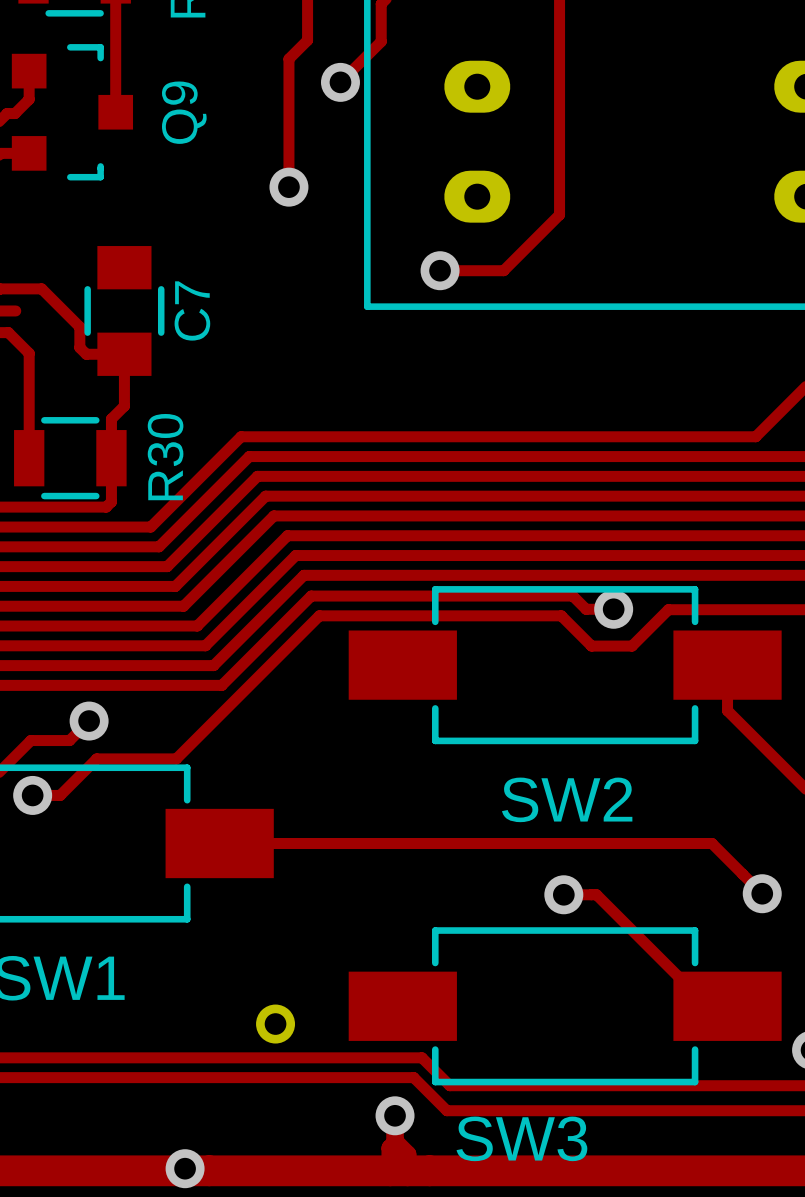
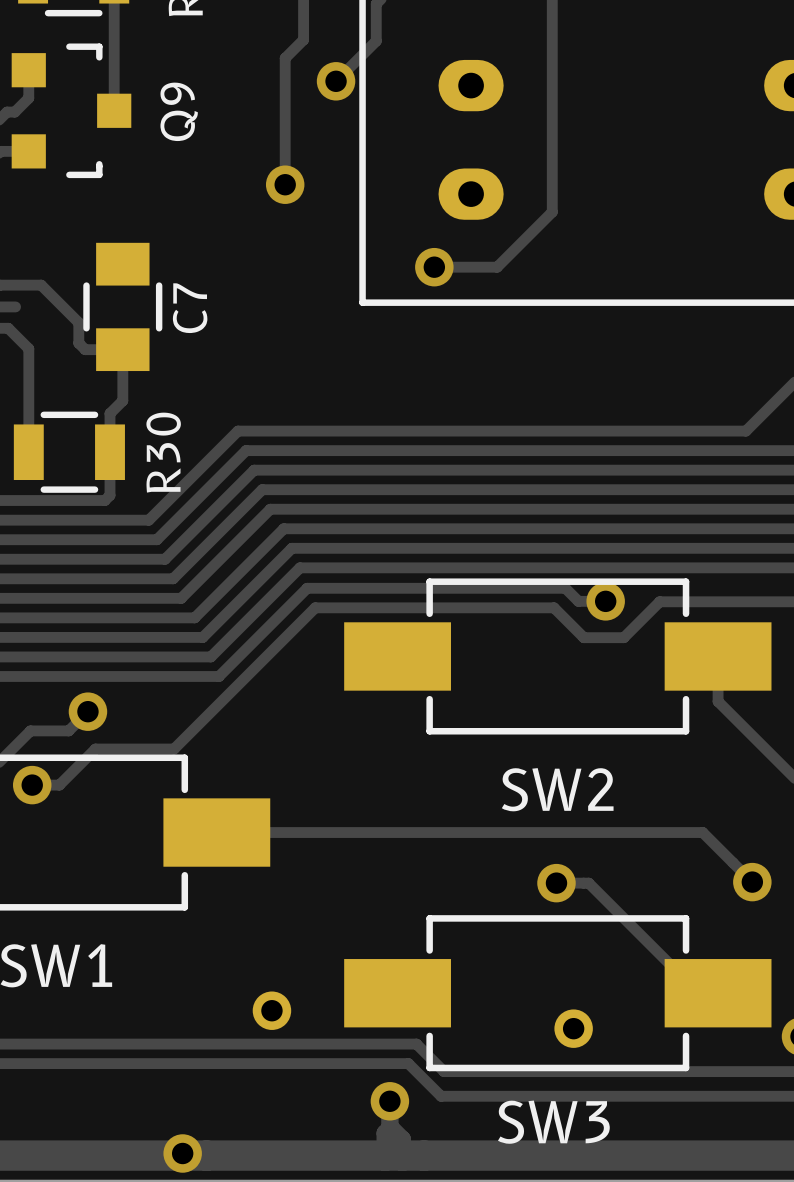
part: none -> (573, 1028)
SW3 name position: SW3 (521, 1138) -> SW3 (553, 1122)

